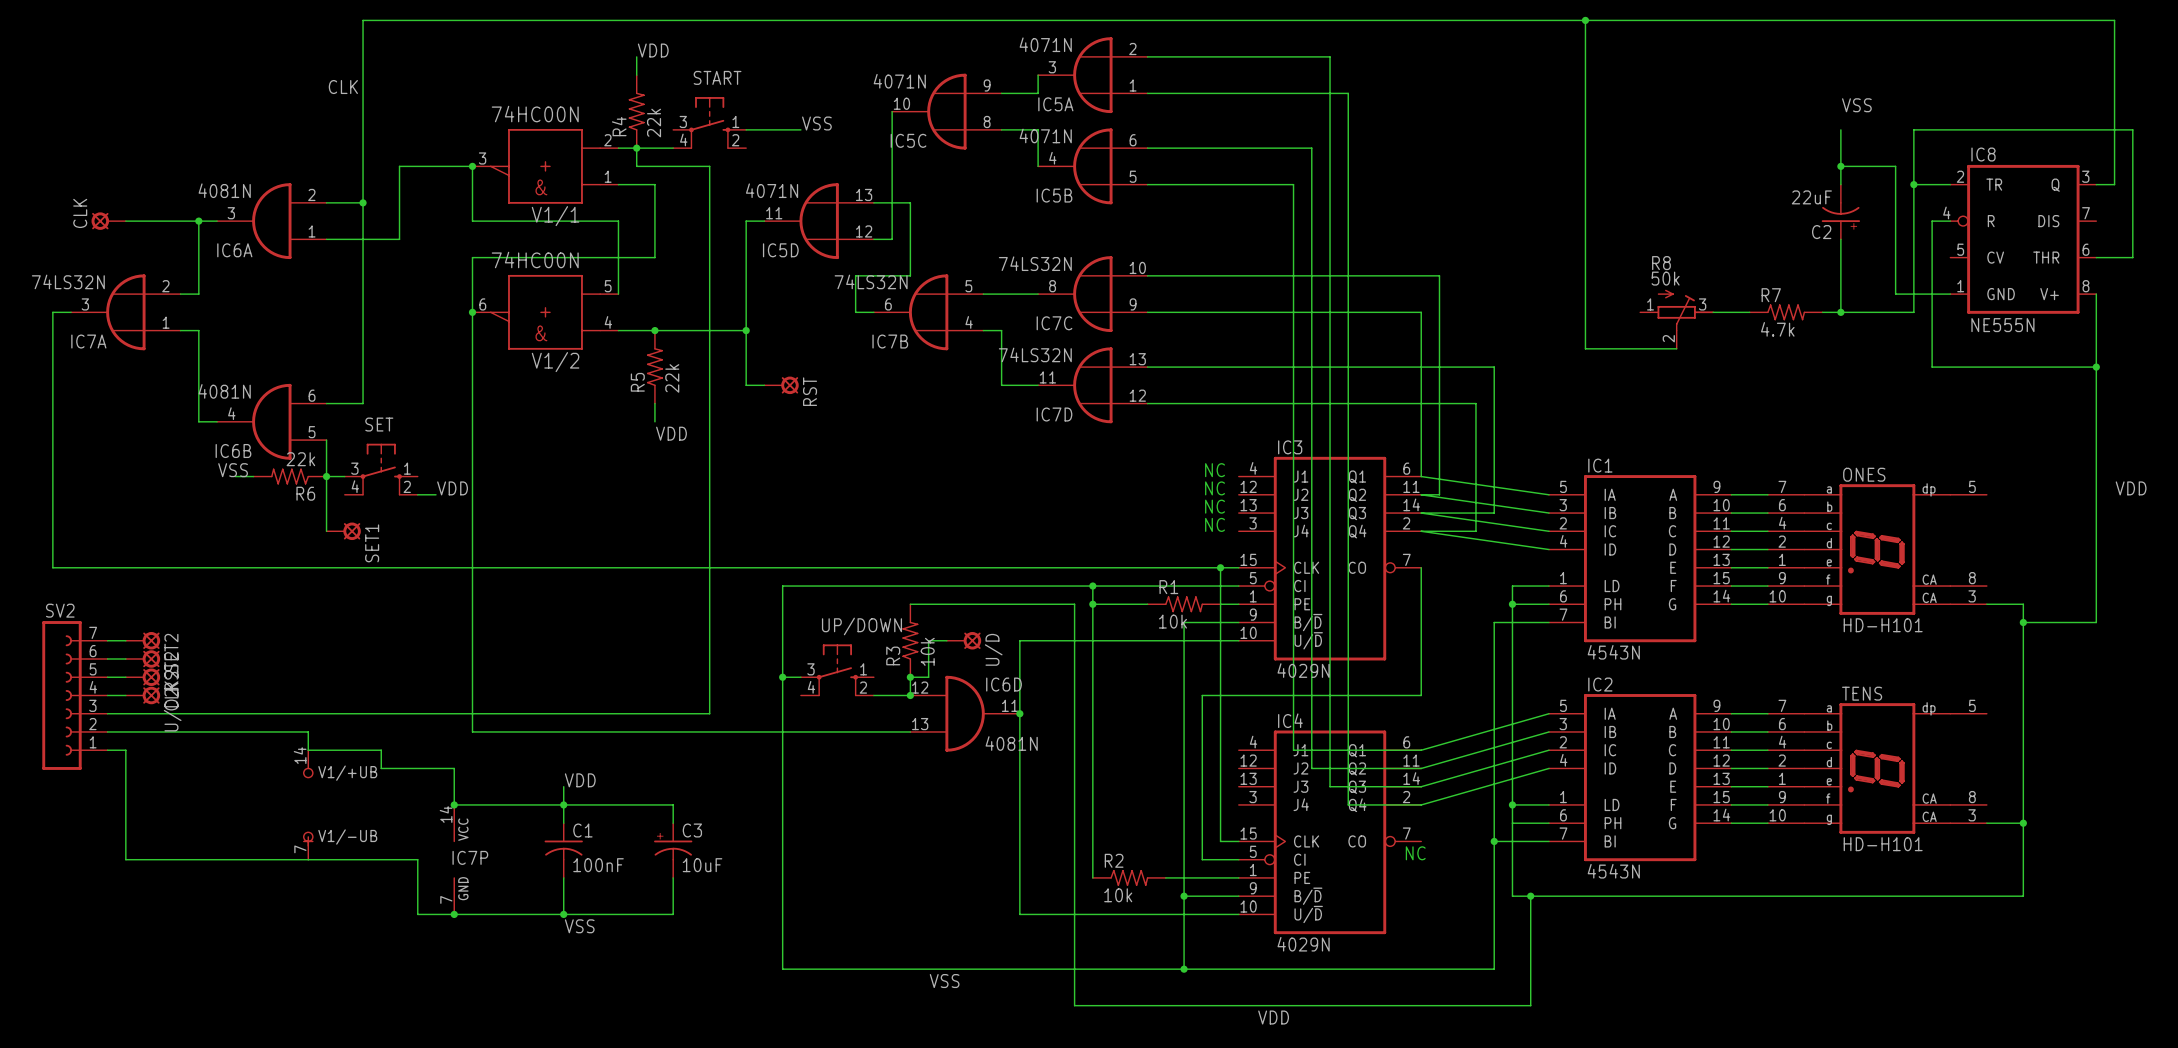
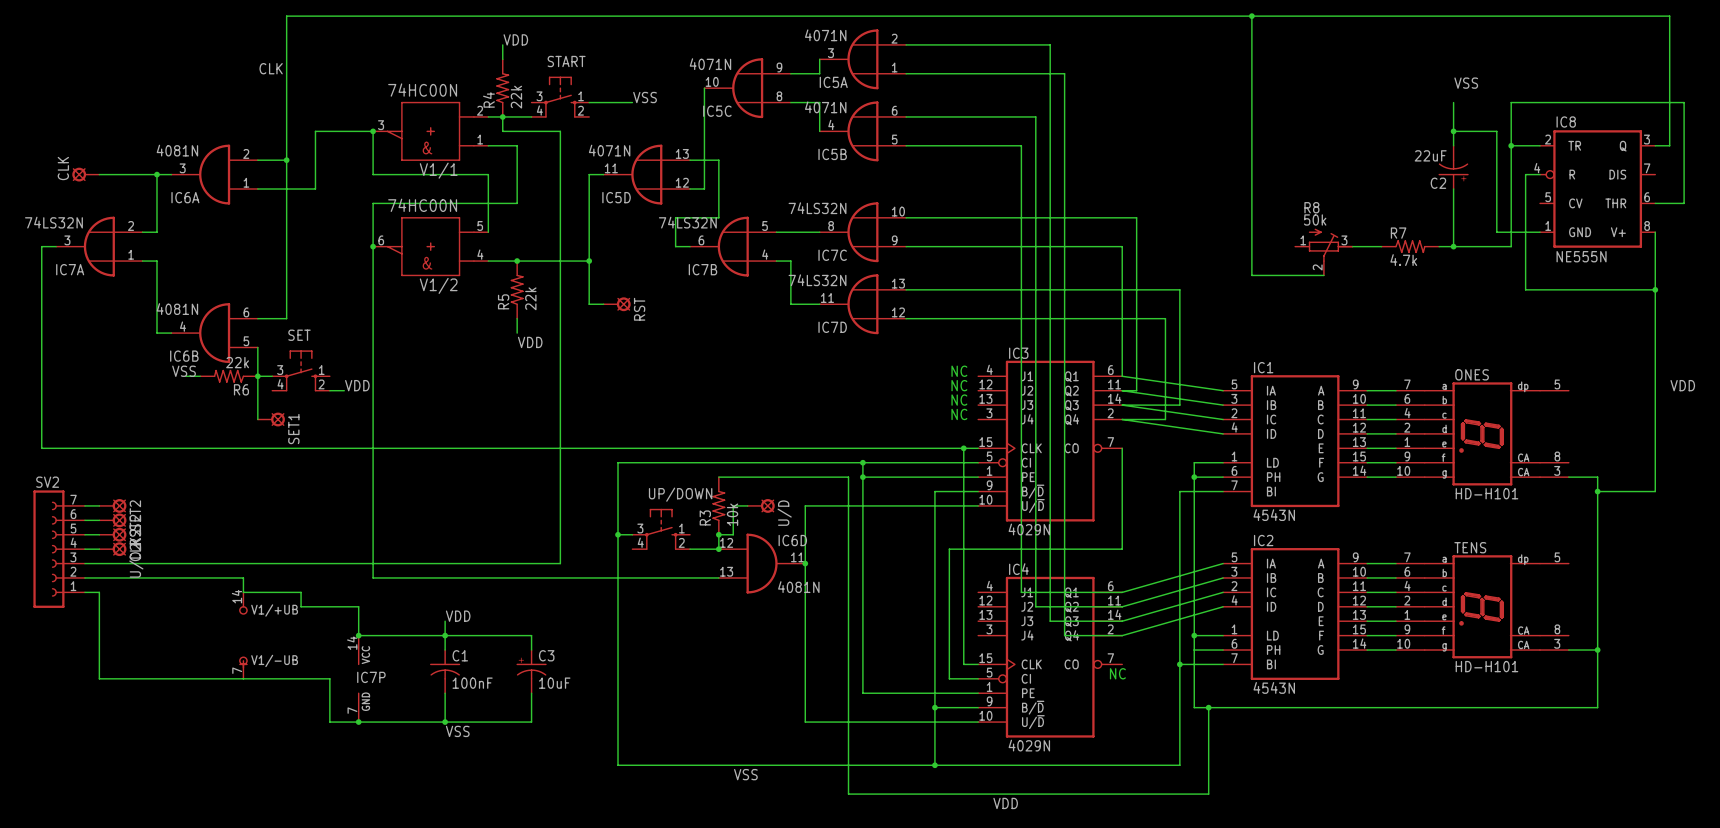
R1: 10k (1184, 604) -> none
R2: 10k (1129, 877) -> none

